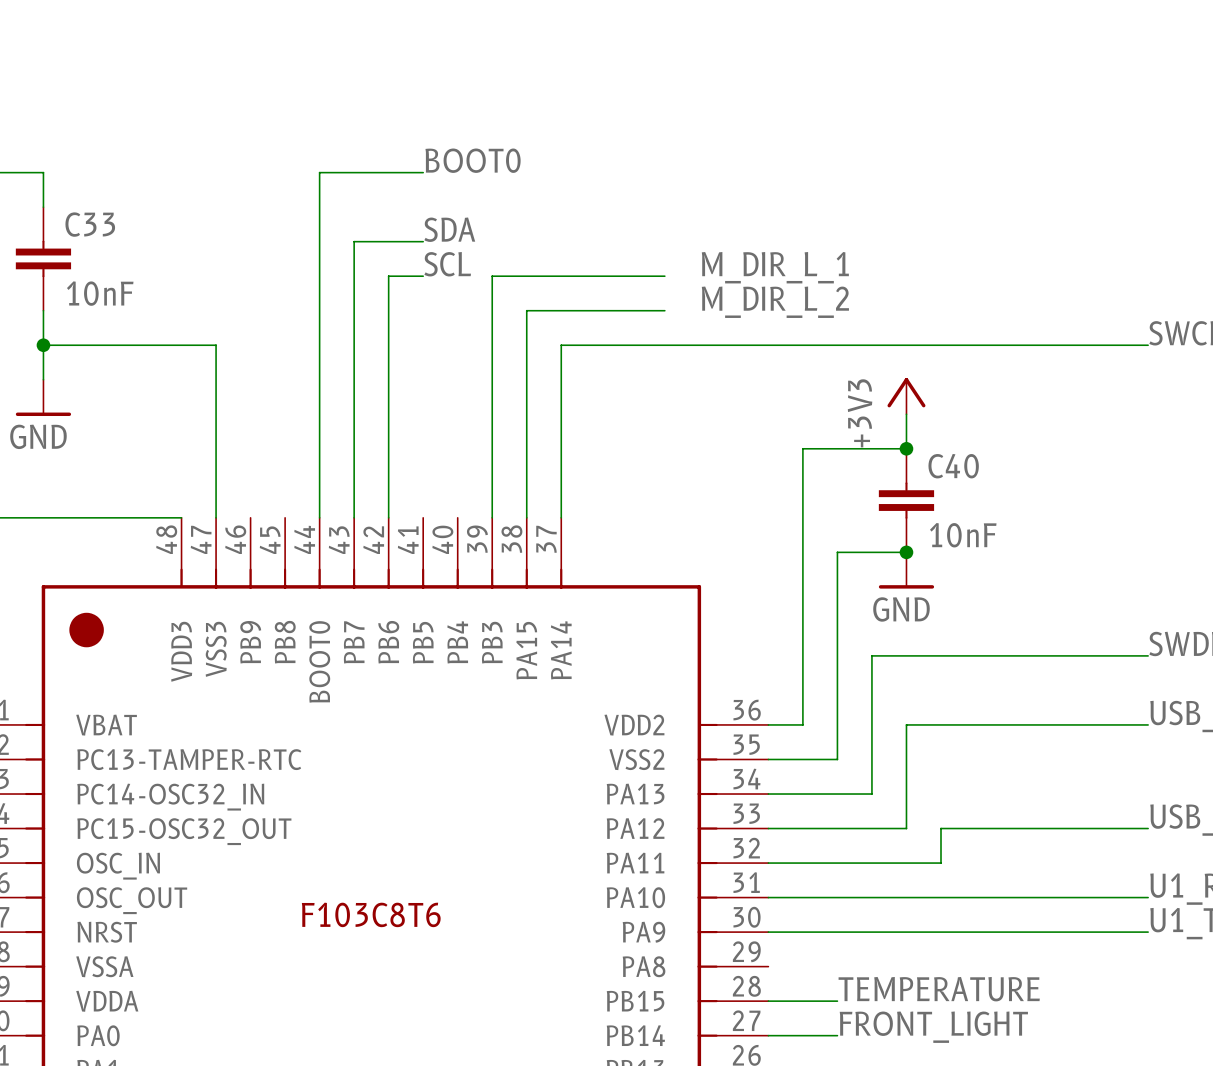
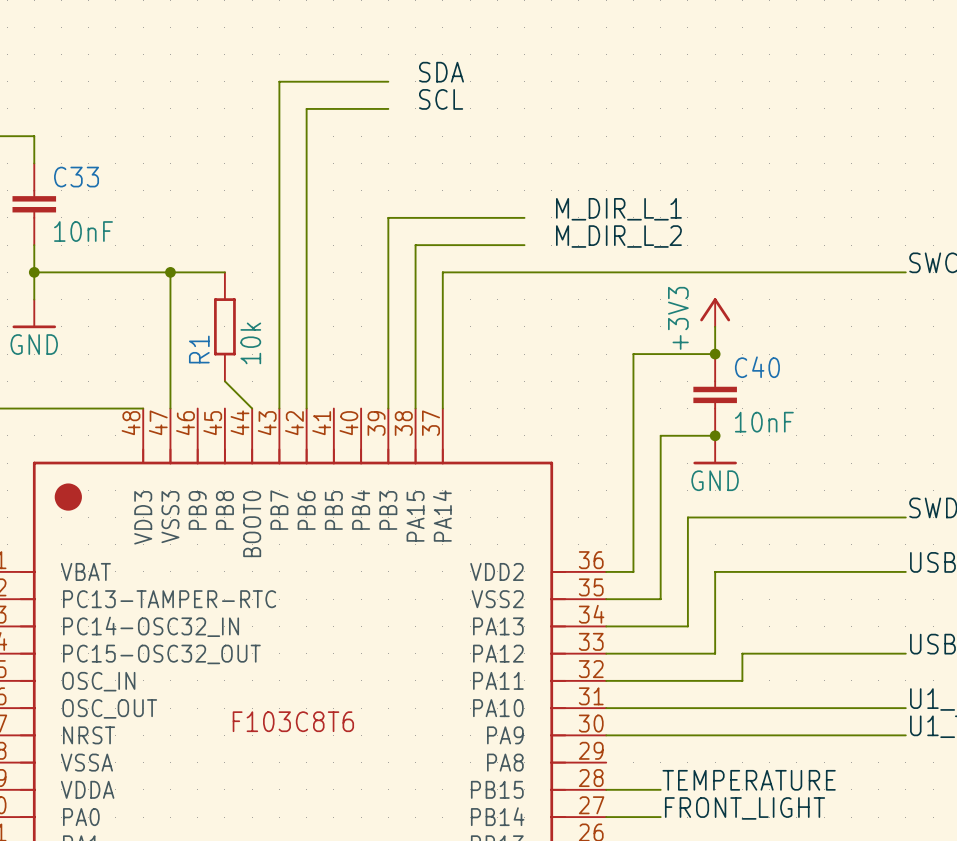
label: BOOT0 (473, 160) -> none
wire: (423, 172) (319, 172) (319, 517) -> (224, 381) (252, 408)
label position: SDA (449, 229) -> SDA (441, 72)
wire: (354, 241) (423, 241) -> (279, 190) (279, 81) (388, 81)
label position: SCL (447, 264) -> SCL (441, 99)
wire: (388, 276) (423, 276) -> (306, 217) (306, 108) (388, 108)
wire: none -> (170, 272) (224, 272)
junction: none -> (170, 272)
R1: none -> 10k (224, 326)

